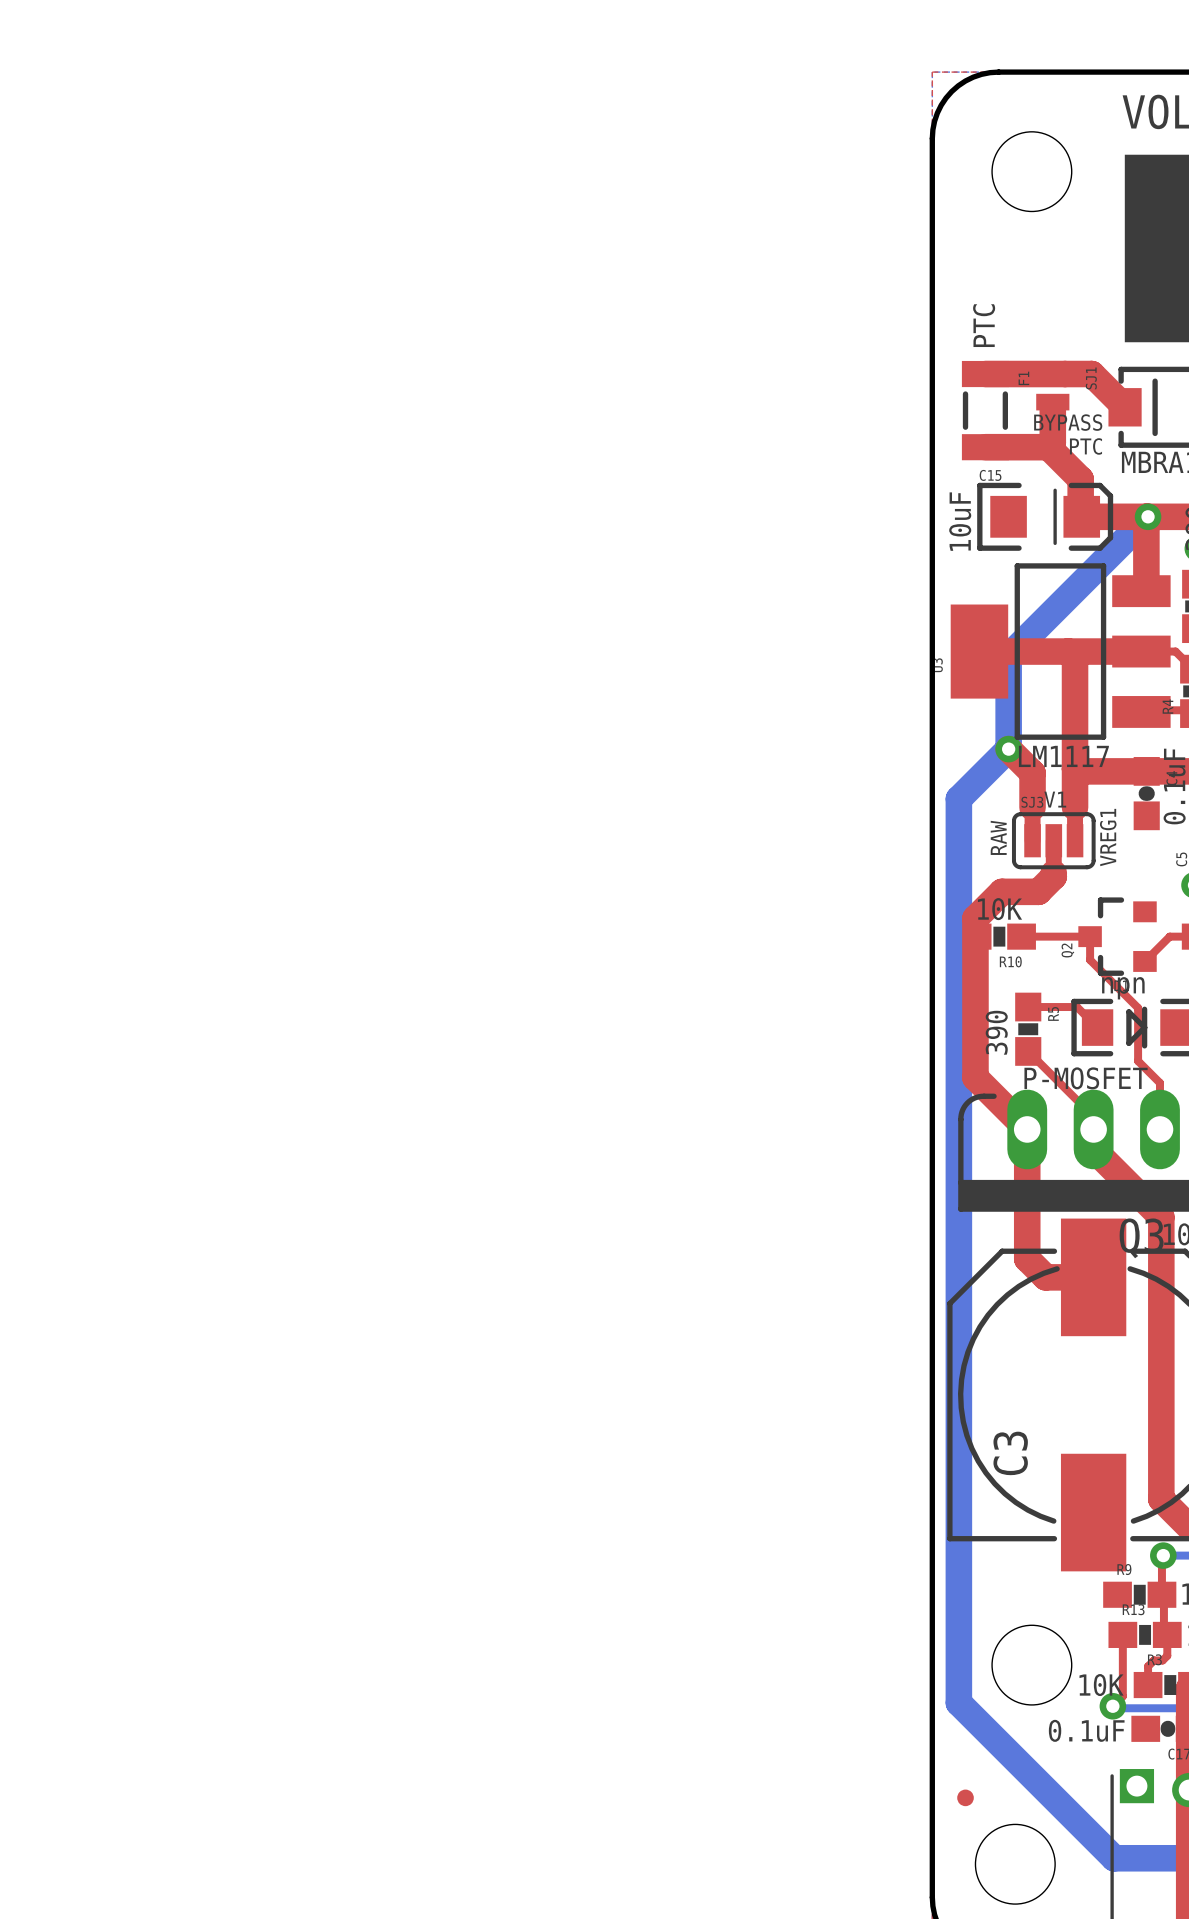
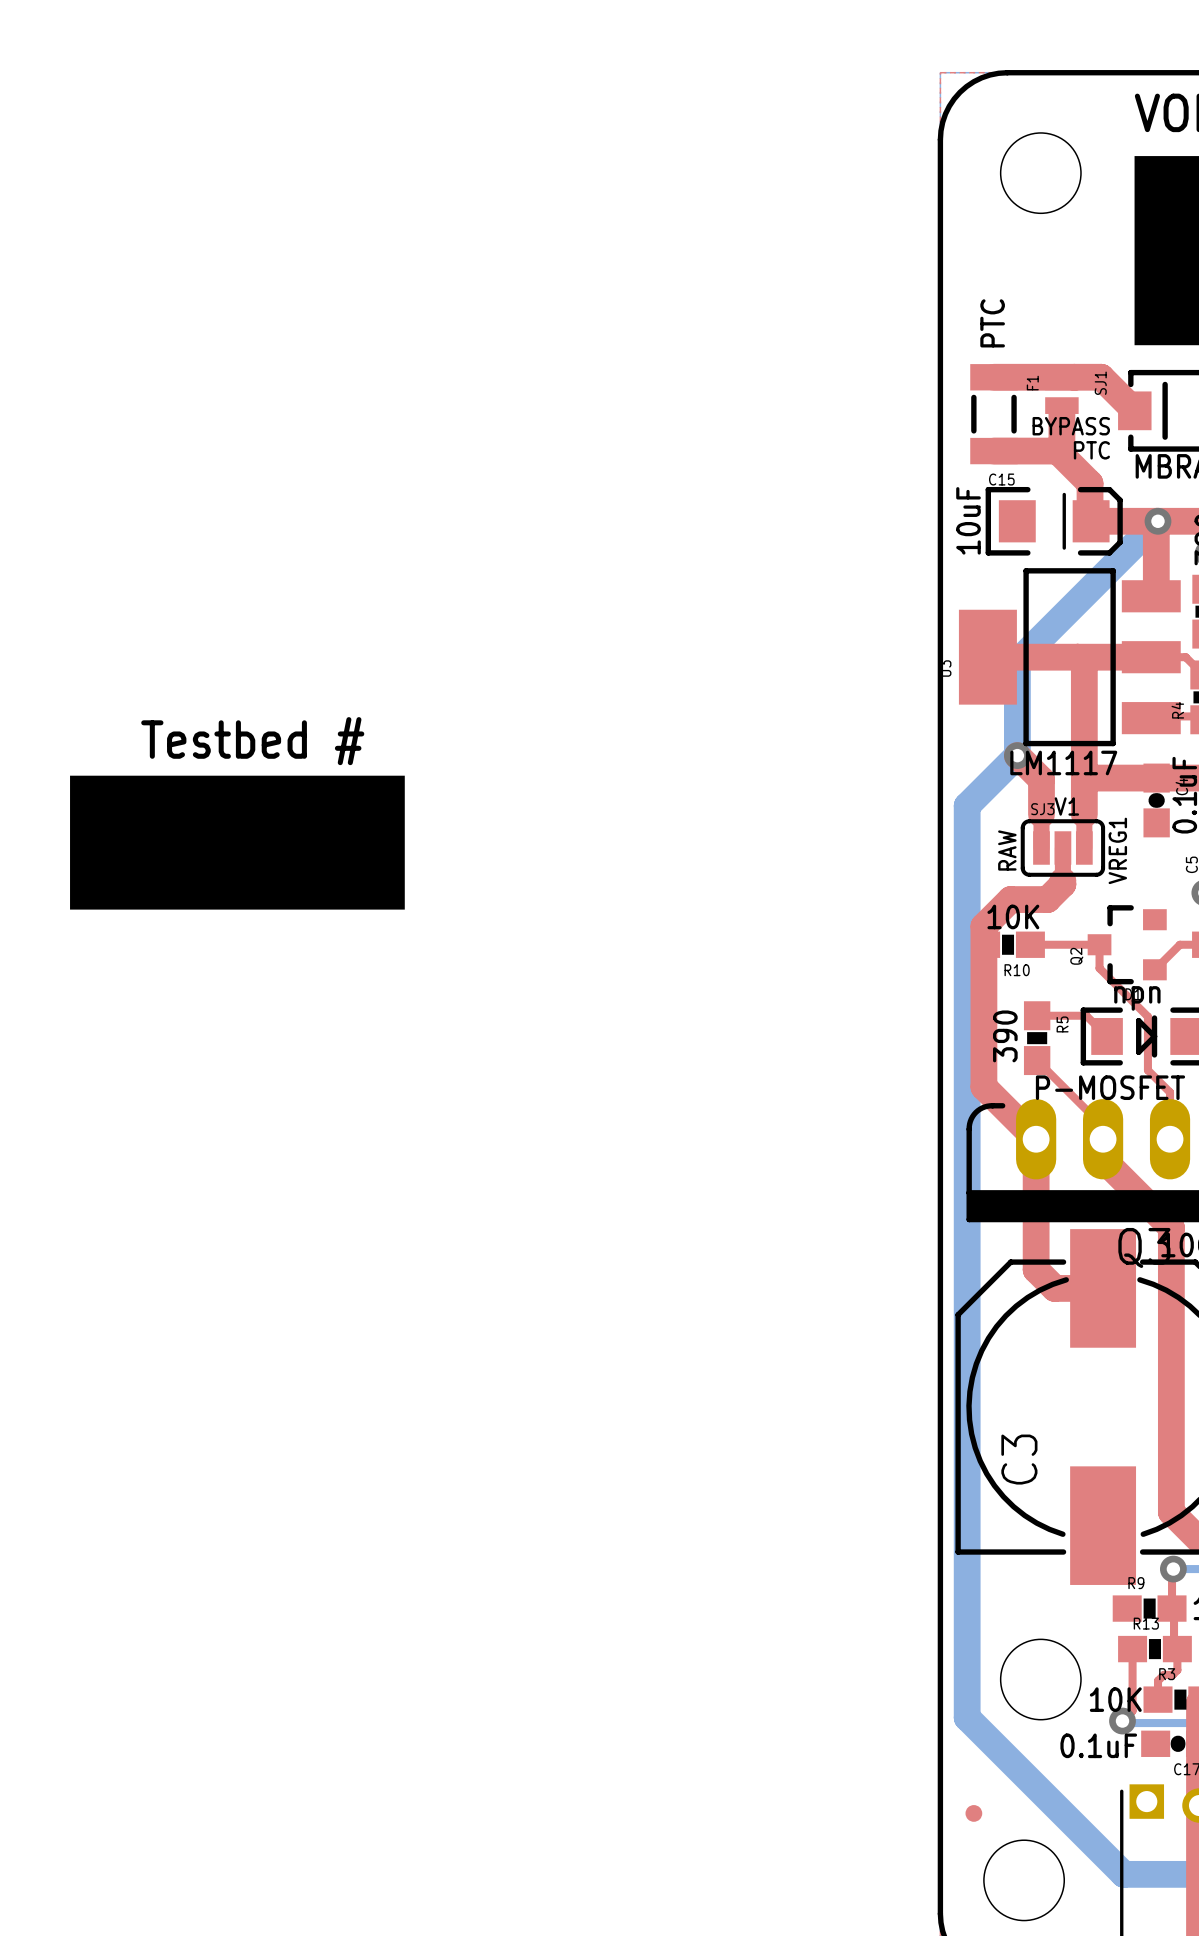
text: none -> Testbed # (252, 741)
drawing: none -> [70, 775, 405, 910]

